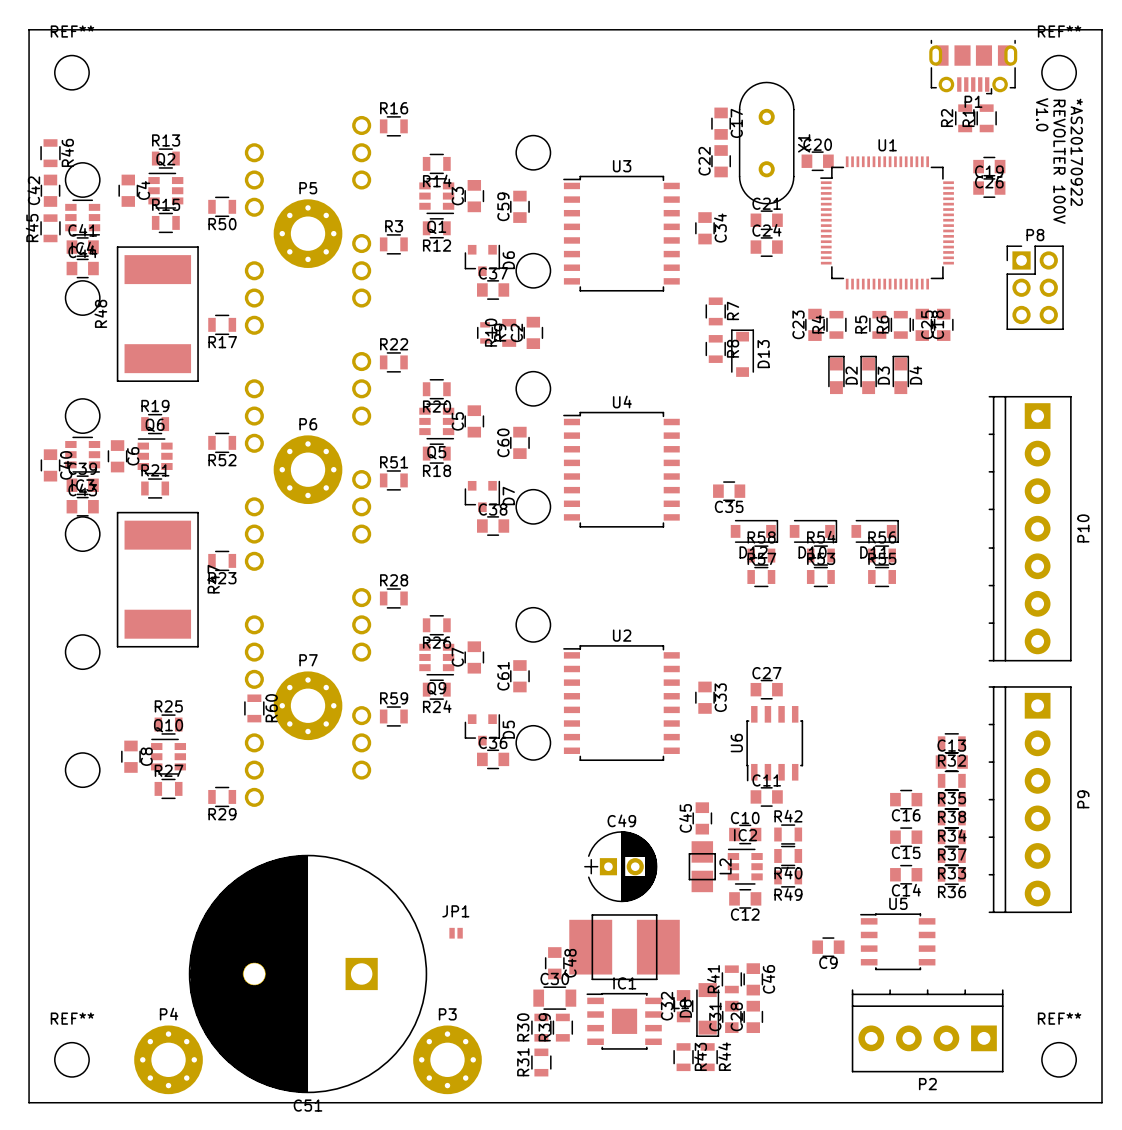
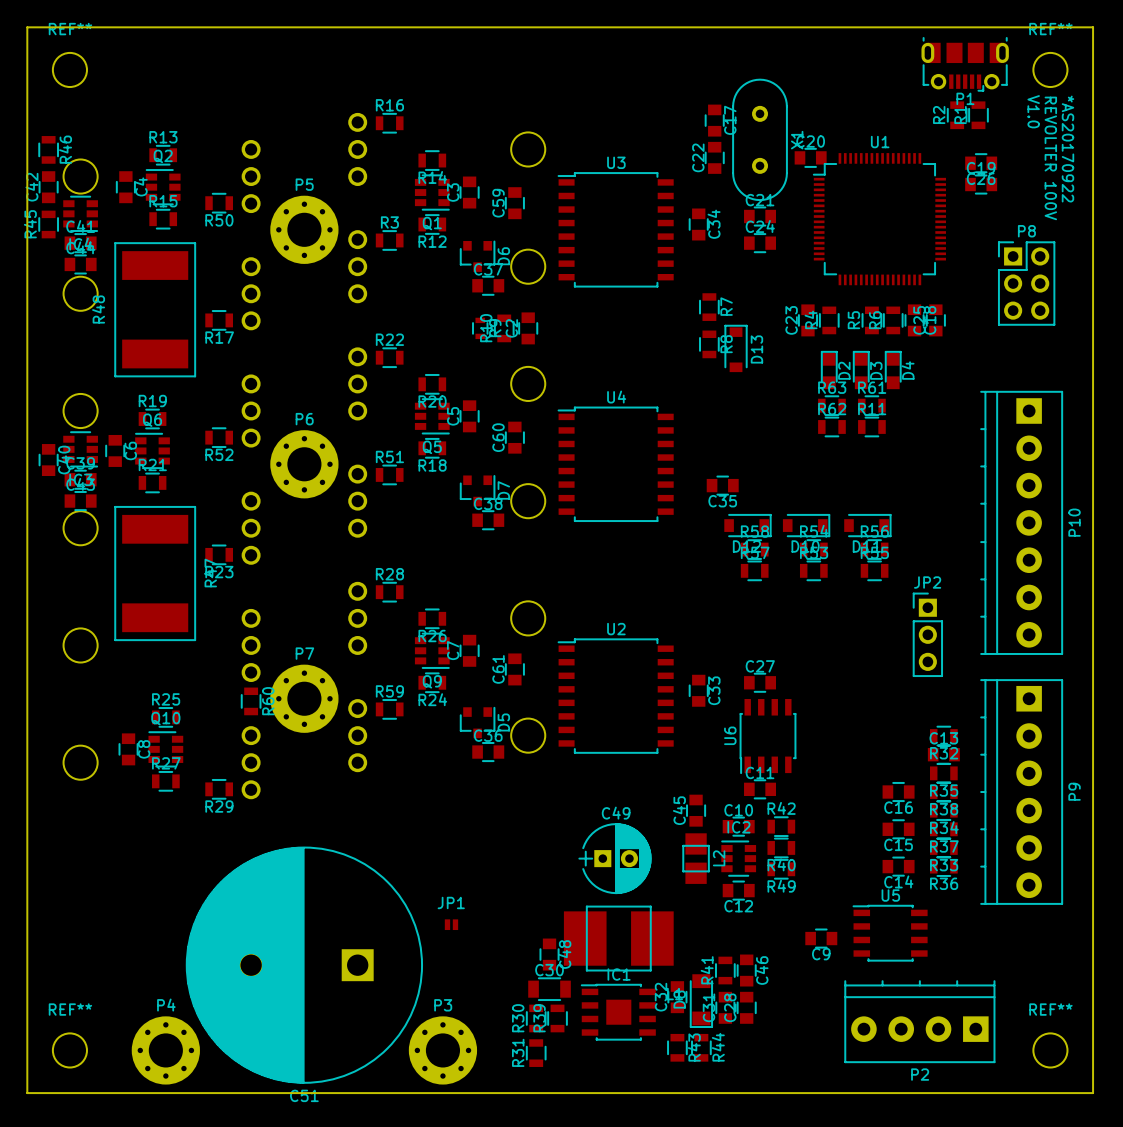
R63: none -> (831, 405)
R61: none -> (871, 405)
R62: none -> (831, 426)
R11: none -> (871, 426)
JP2: none -> (927, 634)

